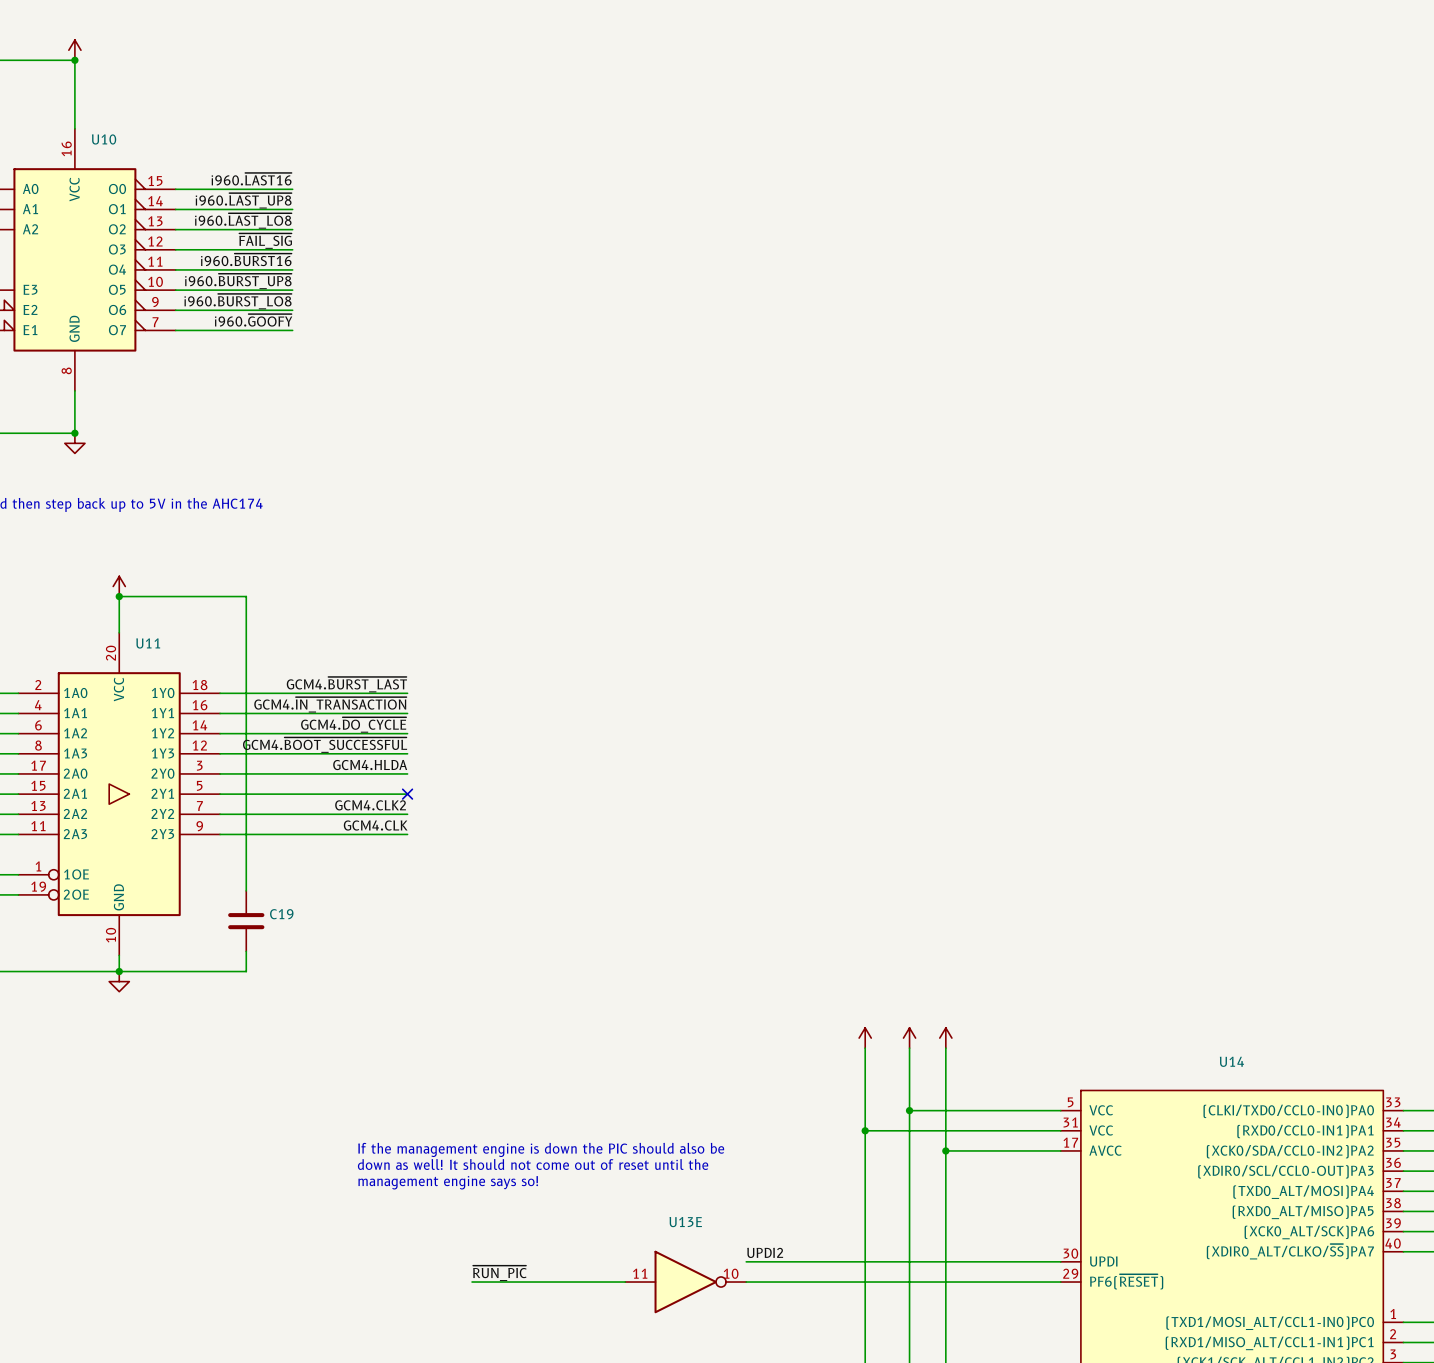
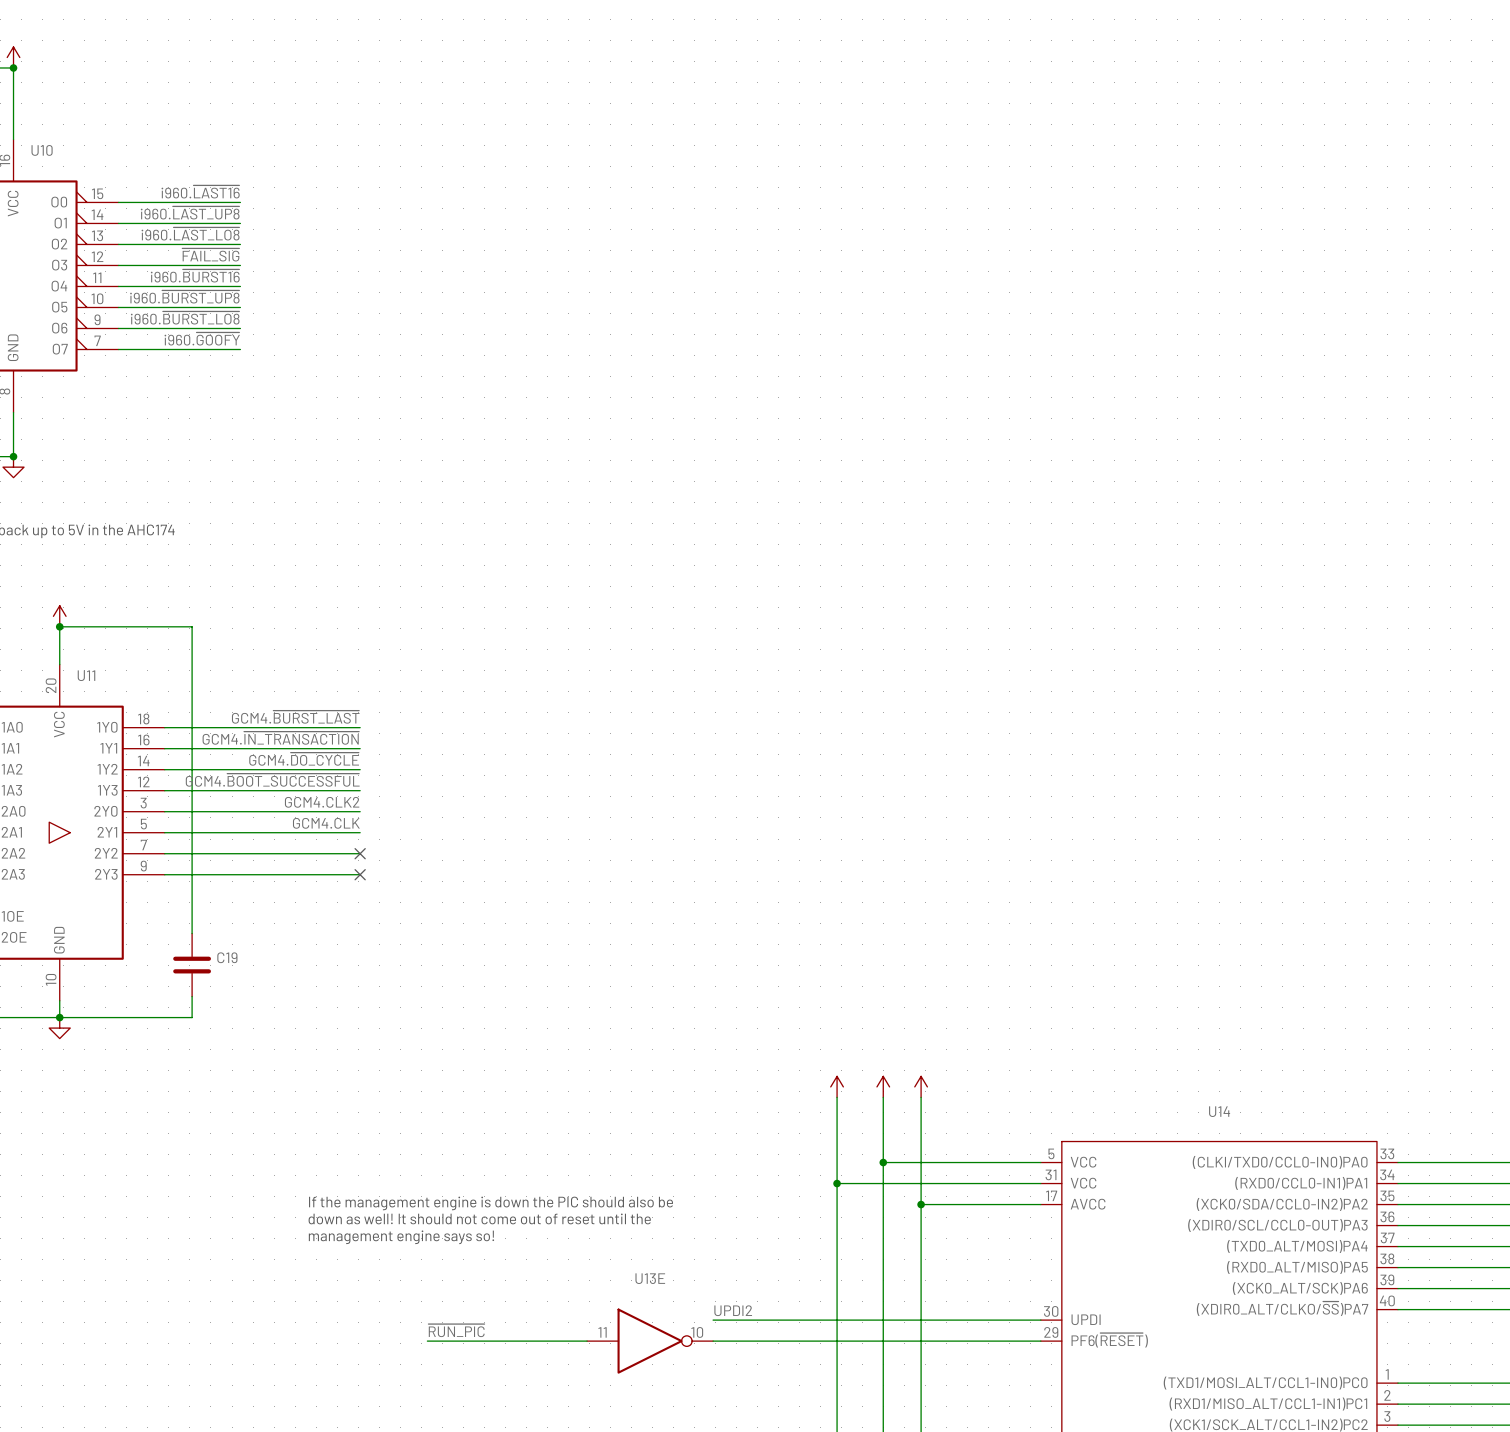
label: GCM4.HLDA (370, 765) -> GCM4.CLK2 (322, 802)
no-connect mark: (407, 794) -> none
label: GCM4.CLK2 (370, 805) -> none
no-connect mark: none -> (360, 853)
label position: GCM4.CLK (375, 825) -> GCM4.CLK (326, 823)
no-connect mark: none -> (360, 874)

